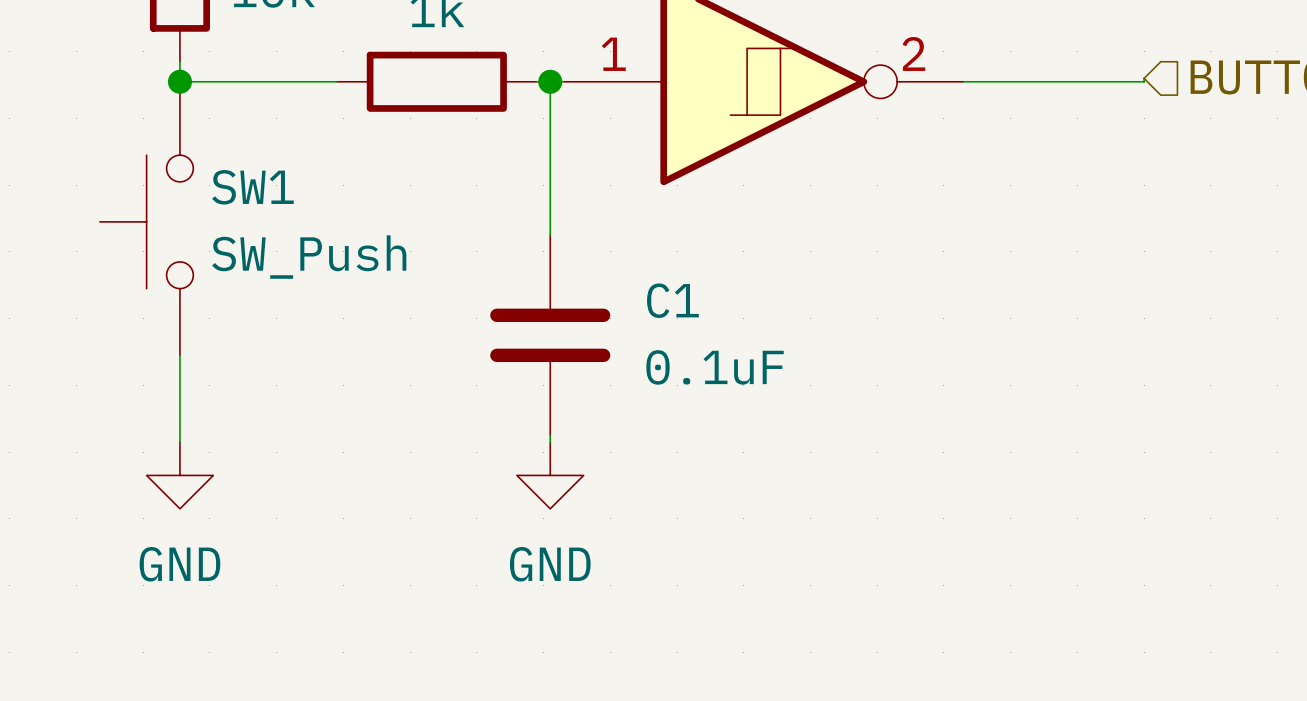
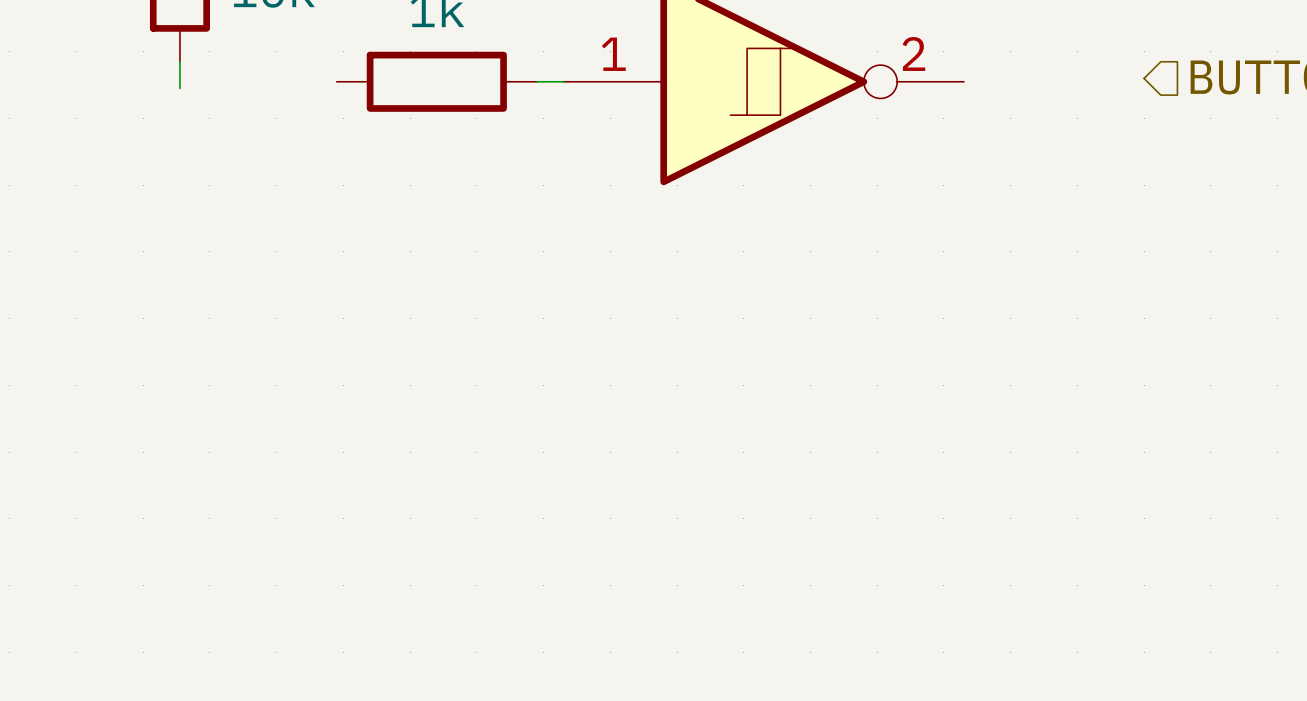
wire: (1144, 78) (1144, 81) (963, 81) -> none
wire: (179, 81) (336, 81) -> none
junction: (179, 81) -> none
wire: (550, 81) (550, 235) -> none
junction: (550, 81) -> none
SW1: SW_Push (146, 221) -> none
C1: 0.1uF (550, 335) -> none
wire: (179, 355) (179, 442) -> none
wire: (550, 435) (550, 442) -> none
power symbol: GND (179, 475) -> none
power symbol: GND (550, 475) -> none

